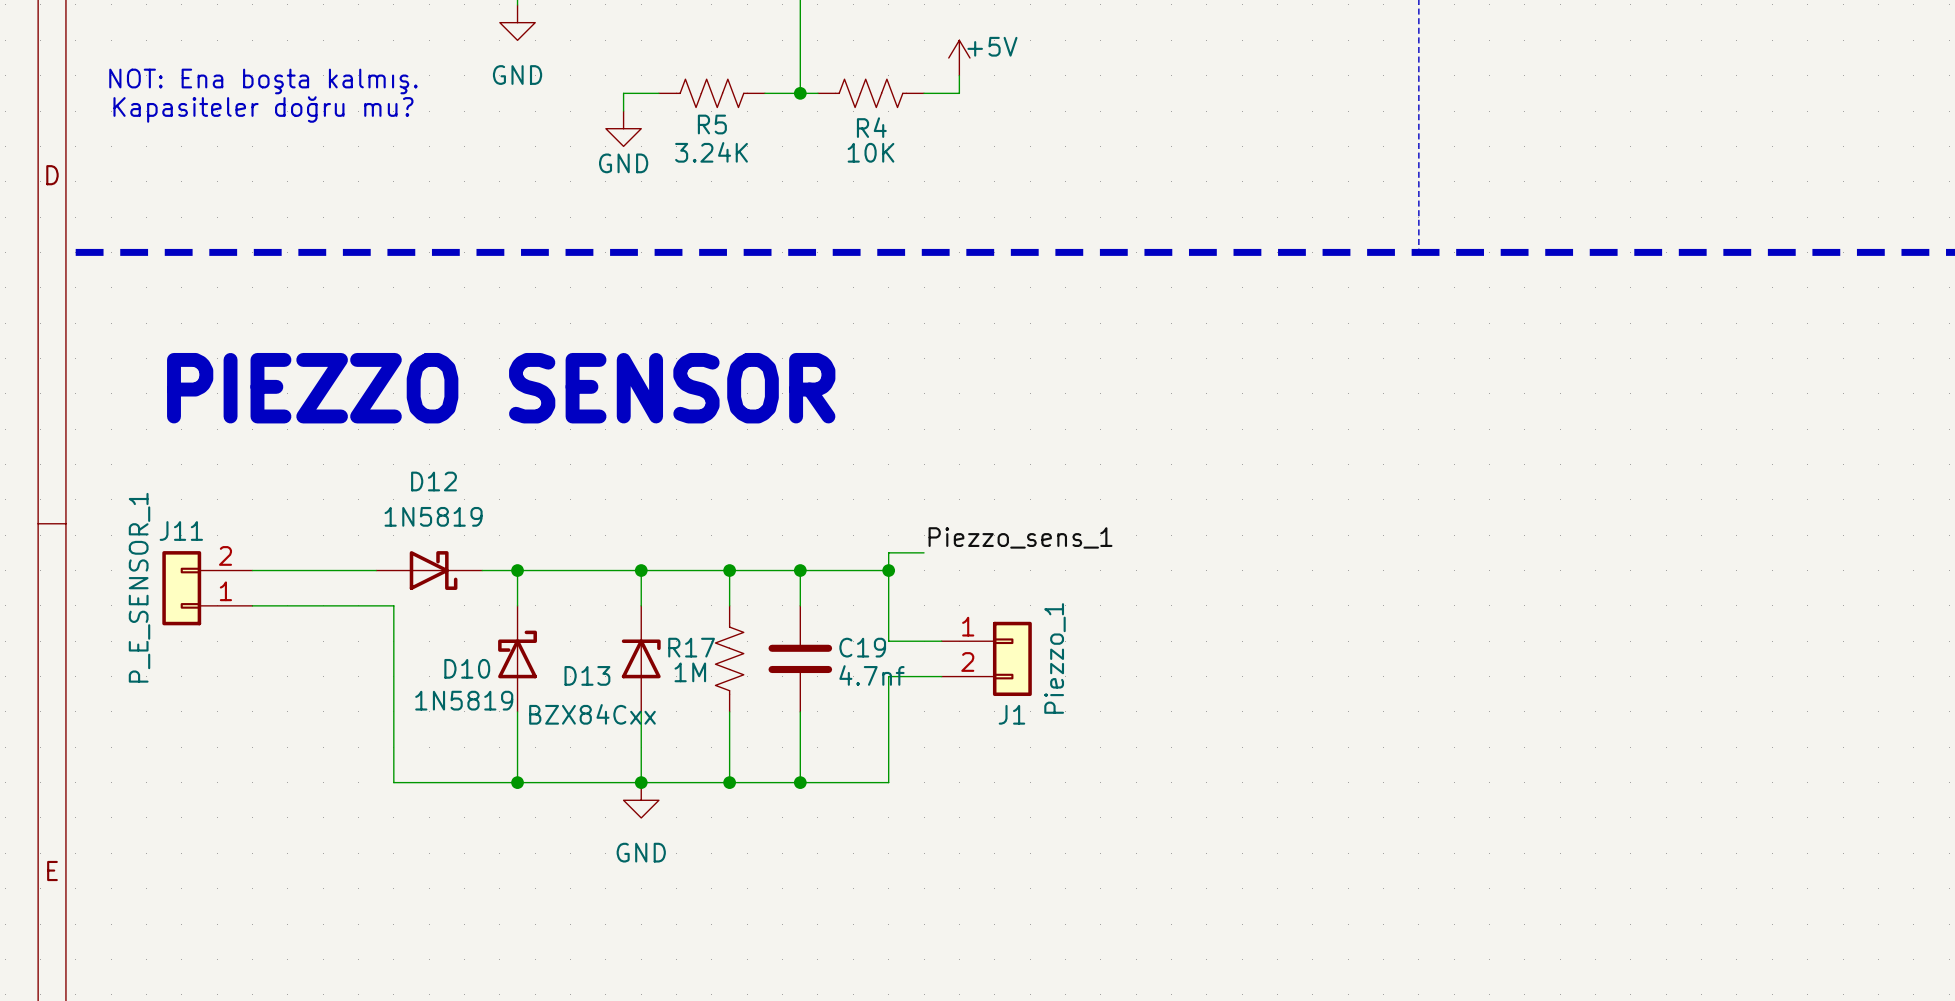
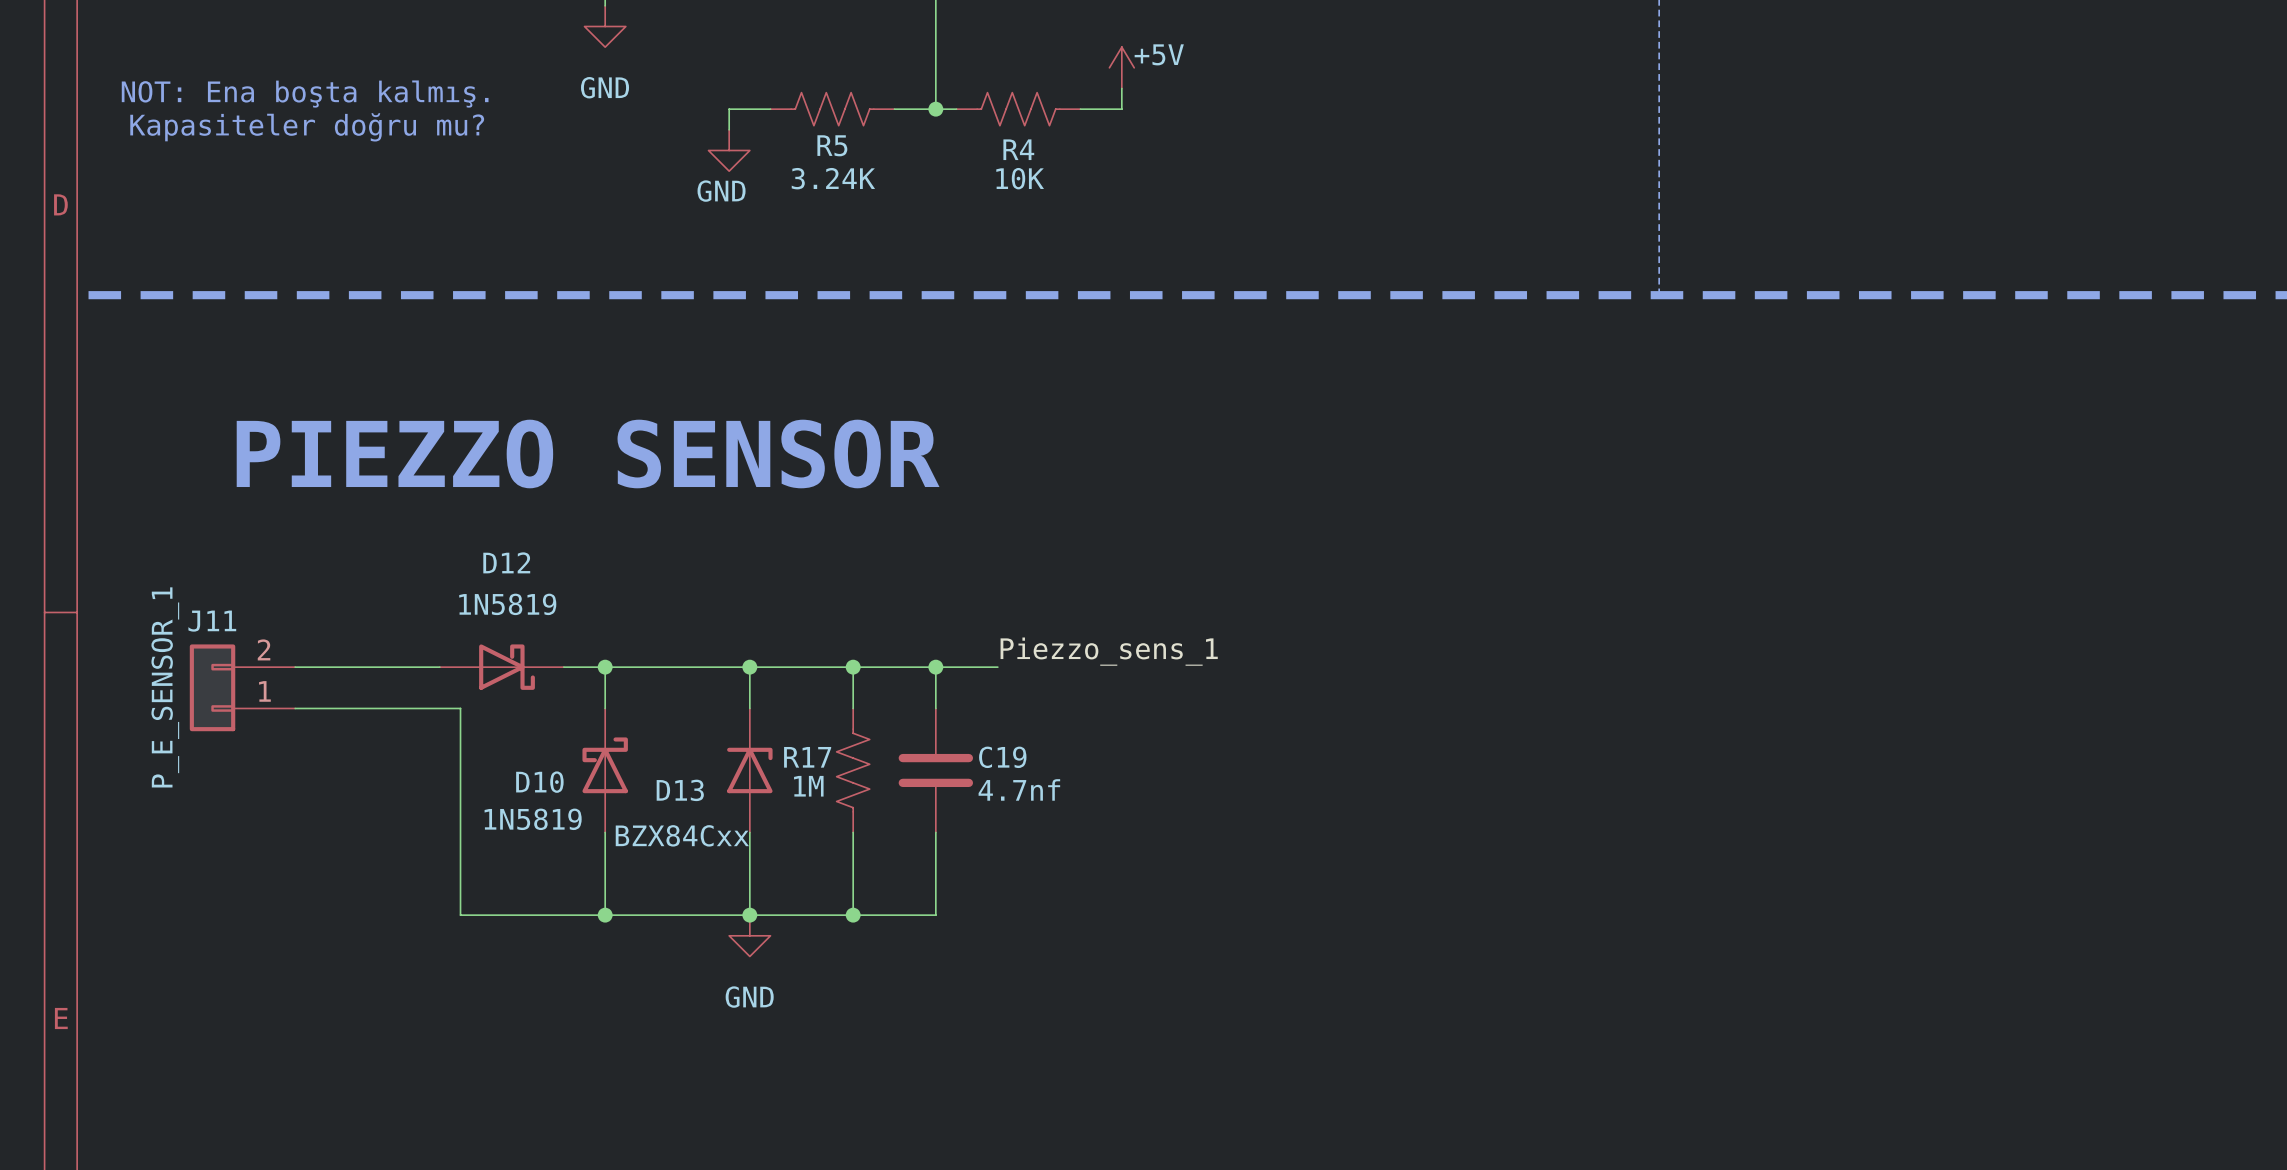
label position: Piezzo_sens_1 (1020, 537) -> Piezzo_sens_1 (1109, 651)
wire: (924, 552) (888, 552) (888, 641) (941, 641) -> none
wire: (853, 570) (888, 570) -> none
junction: (888, 570) -> none
J1: Piezzo_1 (986, 658) -> none
wire: (941, 676) (888, 676) (888, 782) (800, 782) -> none
junction: (800, 782) -> none

